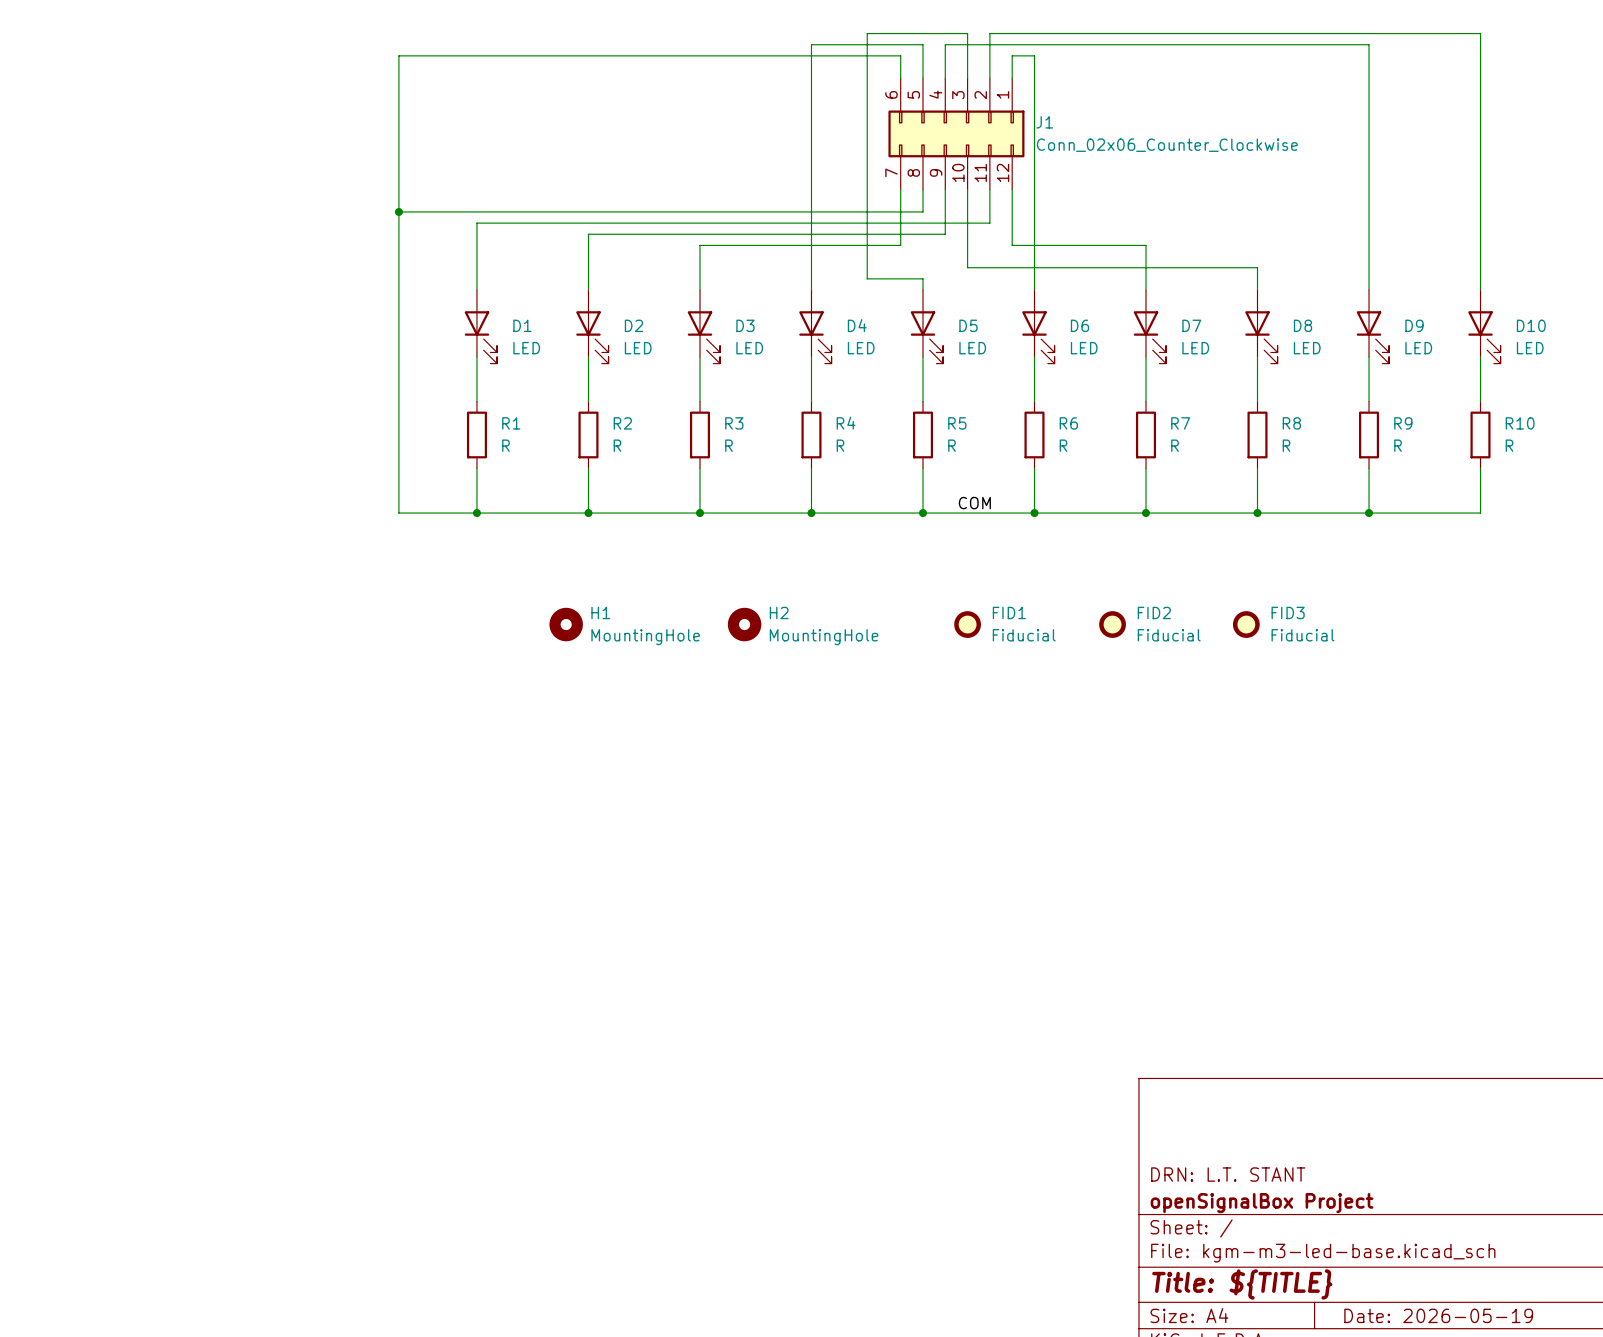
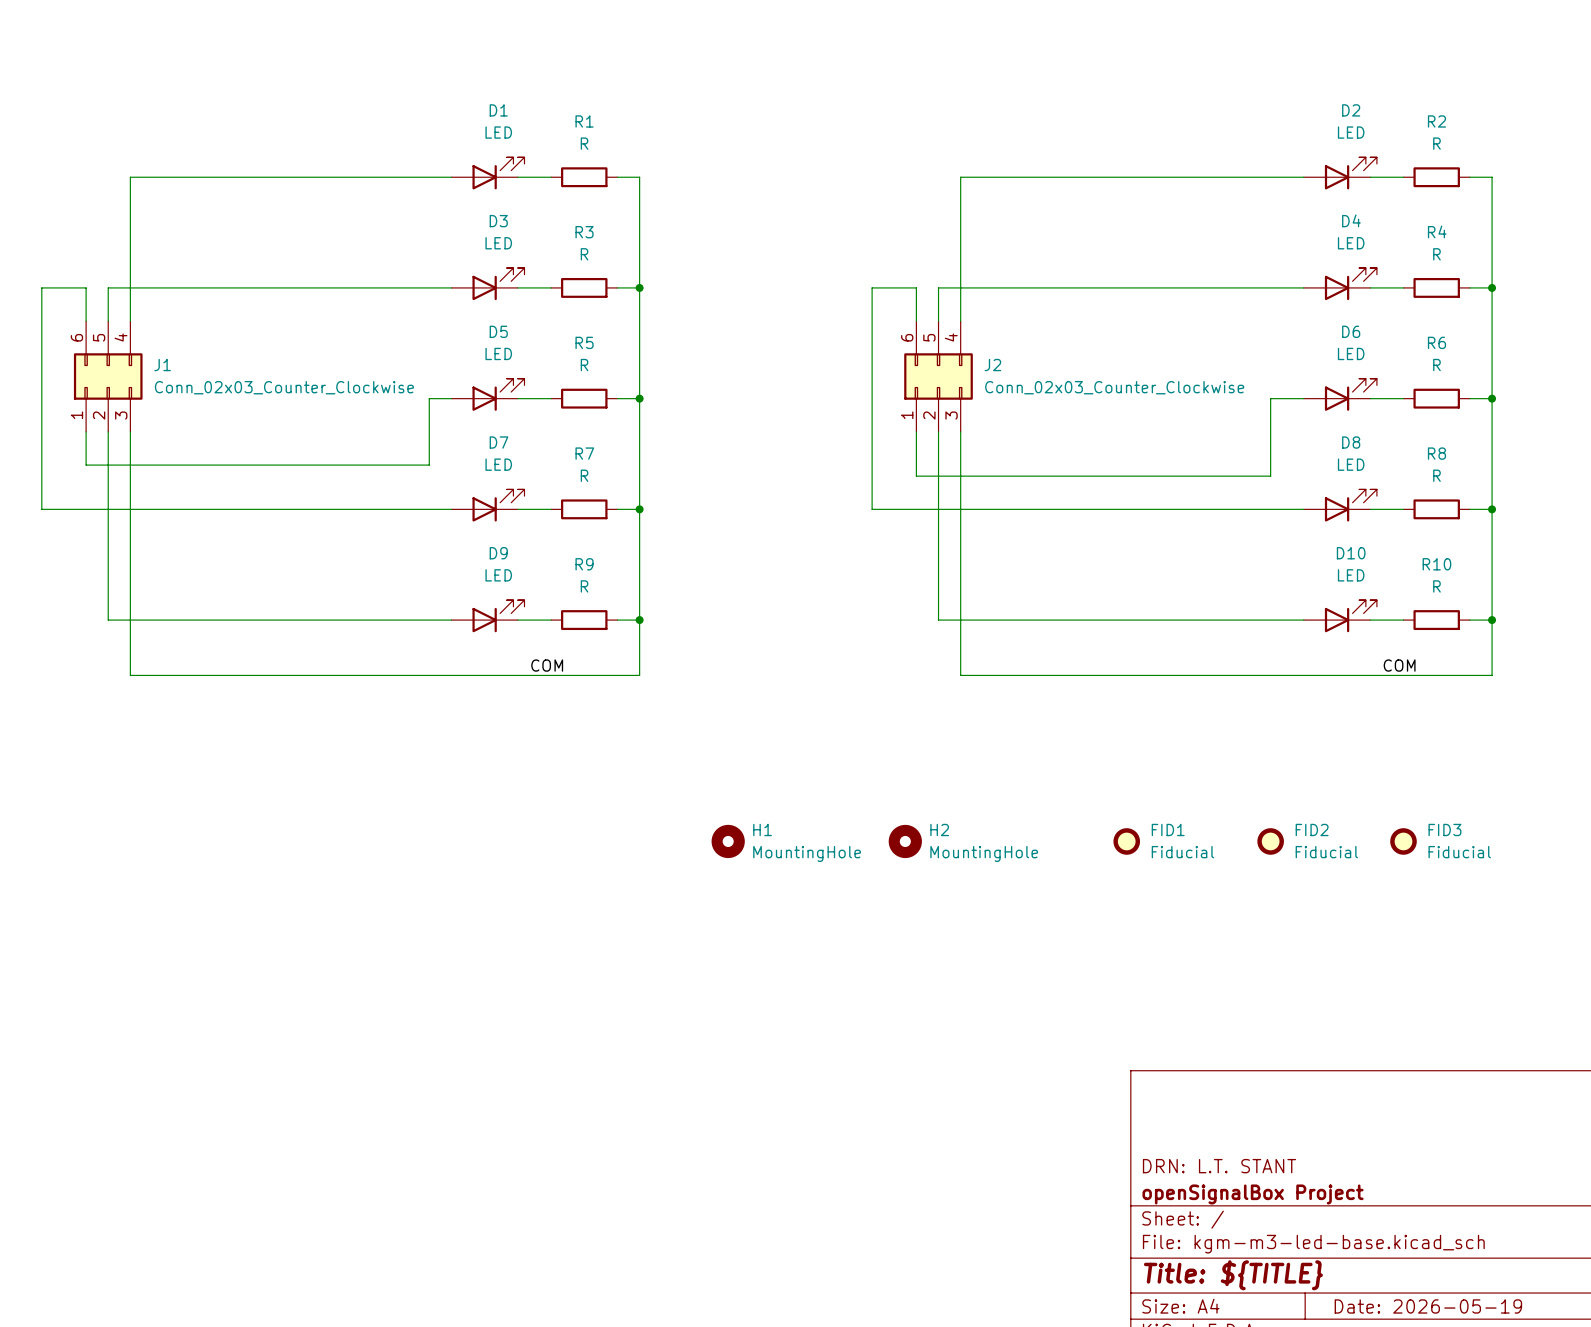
J1 symbol: [888, 78, 1025, 190] -> [73, 321, 143, 432]
wire: (900, 78) (900, 55) (398, 55) (398, 513) -> (86, 321) (86, 287) (41, 287) (41, 509) (396, 509)
wire: (922, 78) (922, 44) (811, 44) (811, 290) -> none
wire: (945, 78) (945, 44) (1369, 44) (1369, 290) -> none
wire: (967, 78) (967, 33) (867, 33) (867, 278) (922, 278) (922, 290) -> none
wire: (989, 78) (989, 33) (1480, 33) (1480, 290) -> (1492, 287) (1469, 287)
wire: (1012, 78) (1012, 55) (1034, 55) (1034, 290) -> none
J1 name position: J1 (1044, 122) -> J1 (162, 365)
J1 value: Conn_02x06_Counter_Clockwise (1167, 145) -> Conn_02x03_Counter_Clockwise (284, 387)
wire: none -> (451, 177) (130, 177) (130, 321)
wire: none -> (517, 177) (551, 177)
wire: none -> (617, 177) (639, 177) (639, 675) (130, 675) (130, 431)
wire: none -> (1303, 177) (960, 177) (960, 188)
wire: none -> (1370, 177) (1403, 177)
wire: none -> (1469, 177) (1492, 177) (1492, 675) (960, 675) (960, 431)
wire: (900, 189) (900, 245) (699, 245) (699, 290) -> none
wire: (922, 189) (922, 211) (398, 211) -> none
wire: (945, 189) (945, 234) (588, 234) (588, 290) -> none
wire: (989, 189) (989, 223) (476, 223) (476, 290) -> none
wire: (1012, 189) (1012, 245) (1146, 245) (1146, 290) -> none
junction: (398, 211) -> none
wire: (967, 267) (1257, 267) (1257, 290) -> (960, 265) (960, 321)
wire: none -> (451, 287) (108, 287) (108, 321)
wire: none -> (517, 287) (551, 287)
wire: none -> (617, 287) (639, 287)
junction: none -> (639, 287)
wire: none -> (1303, 287) (938, 287) (938, 321)
wire: none -> (1370, 287) (1403, 287)
junction: none -> (1492, 287)
D1 name position: D1 (522, 325) -> D1 (498, 110)
D2 name position: D2 (633, 325) -> D2 (1351, 110)
D3 name position: D3 (745, 325) -> D3 (498, 221)
D4 name position: D4 (857, 325) -> D4 (1351, 220)
D5 name position: D5 (968, 325) -> D5 (498, 331)
D6 name position: D6 (1079, 325) -> D6 (1351, 331)
D7 name position: D7 (1191, 325) -> D7 (499, 442)
D8 name position: D8 (1302, 325) -> D8 (1351, 442)
D9 name position: D9 (1414, 325) -> D9 (498, 553)
D10 name position: D10 (1531, 325) -> D10 (1351, 553)
D1 position: (480, 326) -> (487, 173)
D2 position: (592, 326) -> (1340, 173)
D3 position: (703, 326) -> (487, 284)
D4 position: (815, 326) -> (1340, 284)
D5 position: (926, 326) -> (487, 394)
D6 position: (1038, 326) -> (1340, 394)
D7 position: (1149, 326) -> (487, 505)
D8 position: (1261, 326) -> (1340, 505)
D9 position: (1372, 326) -> (487, 616)
D10 position: (1484, 326) -> (1340, 616)
D1 rotation: 0° (480, 337) -> 90° counterclockwise (498, 173)
D2 rotation: 0° (592, 337) -> 90° counterclockwise (1350, 173)
D3 rotation: 0° (703, 337) -> 90° counterclockwise (498, 284)
D4 rotation: 0° (815, 337) -> 90° counterclockwise (1350, 284)
D5 rotation: 0° (926, 337) -> 90° counterclockwise (498, 394)
D6 rotation: 0° (1038, 337) -> 90° counterclockwise (1350, 394)
D7 rotation: 0° (1149, 337) -> 90° counterclockwise (498, 505)
D8 rotation: 0° (1261, 337) -> 90° counterclockwise (1350, 505)
D9 rotation: 0° (1372, 337) -> 90° counterclockwise (498, 616)
D10 rotation: 0° (1484, 337) -> 90° counterclockwise (1350, 616)
wire: (476, 356) (476, 401) -> none
wire: (588, 356) (588, 401) -> none
wire: (699, 356) (699, 401) -> none
wire: (811, 356) (811, 401) -> none
wire: (1034, 356) (1034, 401) -> none
wire: (1146, 356) (1146, 401) -> none
wire: (1257, 356) (1257, 401) -> none
wire: (1369, 356) (1369, 401) -> none
wire: (1480, 356) (1480, 401) -> (1492, 398) (1469, 398)
J2: none -> Conn_02x03_Counter_Clockwise (938, 376)
wire: none -> (451, 398) (429, 398) (429, 465) (86, 465) (86, 431)
wire: none -> (517, 398) (551, 398)
wire: none -> (617, 398) (639, 398)
junction: none -> (639, 398)
wire: none -> (1370, 398) (1403, 398)
junction: none -> (1492, 398)
R1 name position: R1 (511, 423) -> R1 (584, 121)
R2 name position: R2 (622, 423) -> R2 (1436, 121)
R3 name position: R3 (734, 423) -> R3 (584, 232)
R4 name position: R4 (846, 423) -> R4 (1437, 231)
R5 name position: R5 (957, 423) -> R5 (584, 342)
R6 name position: R6 (1068, 423) -> R6 (1436, 342)
R7 name position: R7 (1180, 423) -> R7 (584, 453)
R8 name position: R8 (1291, 423) -> R8 (1436, 453)
R9 name position: R9 (1403, 423) -> R9 (584, 564)
R10 name position: R10 (1520, 423) -> R10 (1436, 564)
wire: none -> (108, 431) (108, 620) (451, 620)
R1 rotation: 0° (476, 434) -> 90° clockwise (584, 177)
R1 position: (476, 434) -> (584, 177)
R2 rotation: 0° (588, 434) -> 90° clockwise (1436, 177)
R2 position: (588, 434) -> (1436, 177)
R3 rotation: 0° (699, 434) -> 90° clockwise (584, 287)
R3 position: (699, 434) -> (584, 287)
R4 rotation: 0° (811, 434) -> 90° clockwise (1436, 287)
R4 position: (811, 434) -> (1436, 287)
wire: none -> (916, 431) (916, 465)
R5 rotation: 0° (922, 434) -> 90° clockwise (584, 398)
R5 position: (922, 434) -> (584, 398)
wire: none -> (938, 431) (938, 620) (1303, 620)
R6 rotation: 0° (1034, 434) -> 90° clockwise (1436, 398)
R6 position: (1034, 434) -> (1436, 398)
R7 rotation: 0° (1146, 434) -> 90° clockwise (584, 509)
R7 position: (1146, 434) -> (584, 509)
R8 rotation: 0° (1257, 434) -> 90° clockwise (1436, 509)
R8 position: (1257, 434) -> (1436, 509)
R9 rotation: 0° (1369, 434) -> 90° clockwise (584, 620)
R9 position: (1369, 434) -> (584, 620)
R10 rotation: 0° (1480, 434) -> 90° clockwise (1436, 620)
R10 position: (1480, 434) -> (1436, 620)
R1 value position: R (506, 445) -> R (584, 143)
R2 value position: R (617, 445) -> R (1436, 143)
R3 value position: R (729, 445) -> R (584, 254)
R4 value position: R (840, 445) -> R (1436, 254)
R5 value position: R (952, 445) -> R (584, 365)
R6 value position: R (1063, 445) -> R (1436, 365)
R7 value position: R (1175, 445) -> R (584, 475)
R8 value position: R (1286, 445) -> R (1436, 475)
R9 value position: R (1398, 445) -> R (584, 586)
R10 value position: R (1509, 445) -> R (1436, 586)
wire: (476, 468) (476, 513) -> none
wire: (588, 468) (588, 513) -> none
wire: (699, 468) (699, 513) -> none
wire: (811, 468) (811, 513) -> none
wire: (1034, 468) (1034, 513) -> none
wire: (1146, 468) (1146, 513) -> none
wire: (1257, 468) (1257, 513) -> none
wire: (1369, 468) (1369, 513) -> none
wire: (1480, 468) (1480, 513) (1413, 513) -> none
wire: (922, 479) (922, 513) -> (916, 476) (1270, 476) (1270, 398) (1303, 398)
label: COM (974, 503) -> none
junction: (476, 513) -> none
wire: (555, 513) (621, 513) -> none
junction: (588, 513) -> none
wire: (644, 513) (878, 513) -> (916, 321) (916, 287) (872, 287) (872, 509)
junction: none -> (639, 509)
junction: (699, 513) -> none
junction: (811, 513) -> none
junction: (922, 513) -> none
junction: (1034, 513) -> none
junction: (1146, 513) -> none
junction: (1257, 513) -> none
junction: (1369, 513) -> none
wire: none -> (1469, 509) (1492, 509)
junction: none -> (1492, 509)
wire: none -> (517, 620) (551, 620)
H1 position: (566, 624) -> (728, 841)
wire: none -> (617, 620) (639, 620)
junction: none -> (639, 620)
H2 position: (744, 624) -> (905, 841)
FID1 position: (967, 624) -> (1126, 841)
FID2 position: (1112, 624) -> (1270, 841)
FID3 position: (1246, 624) -> (1403, 841)
wire: none -> (1370, 620) (1403, 620)
wire: none -> (1469, 620) (1492, 620)
junction: none -> (1492, 620)
label: none -> COM (547, 665)
label: none -> COM (1399, 665)

